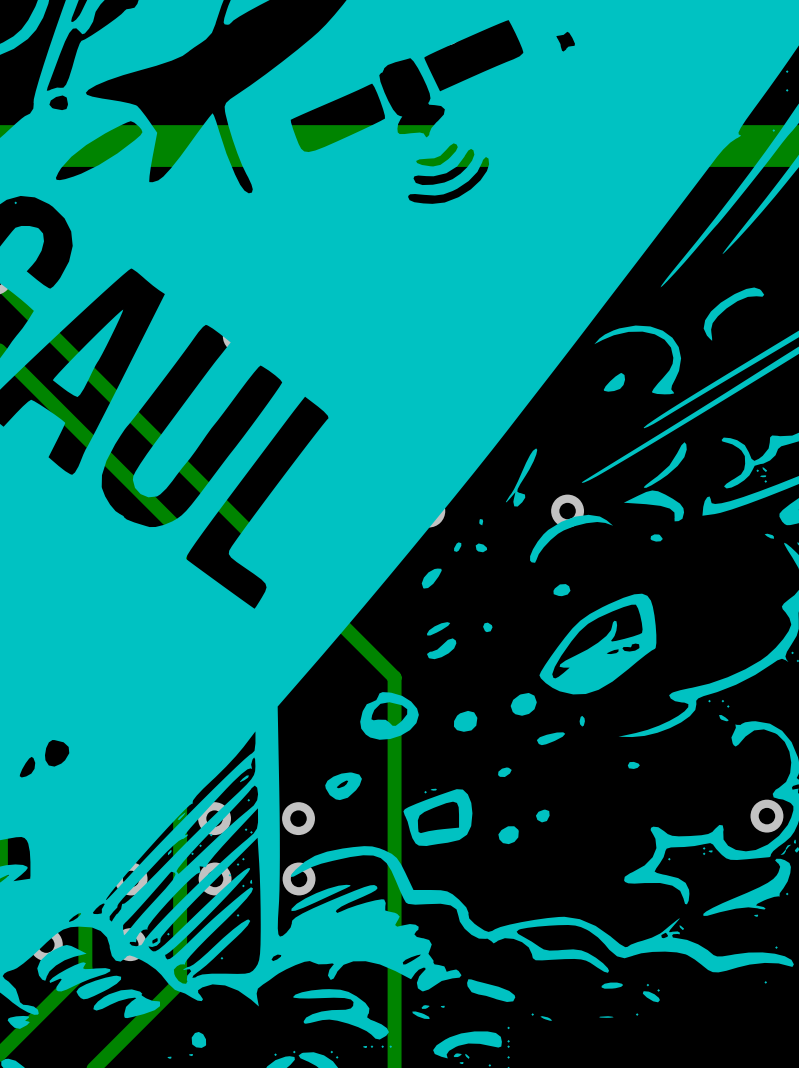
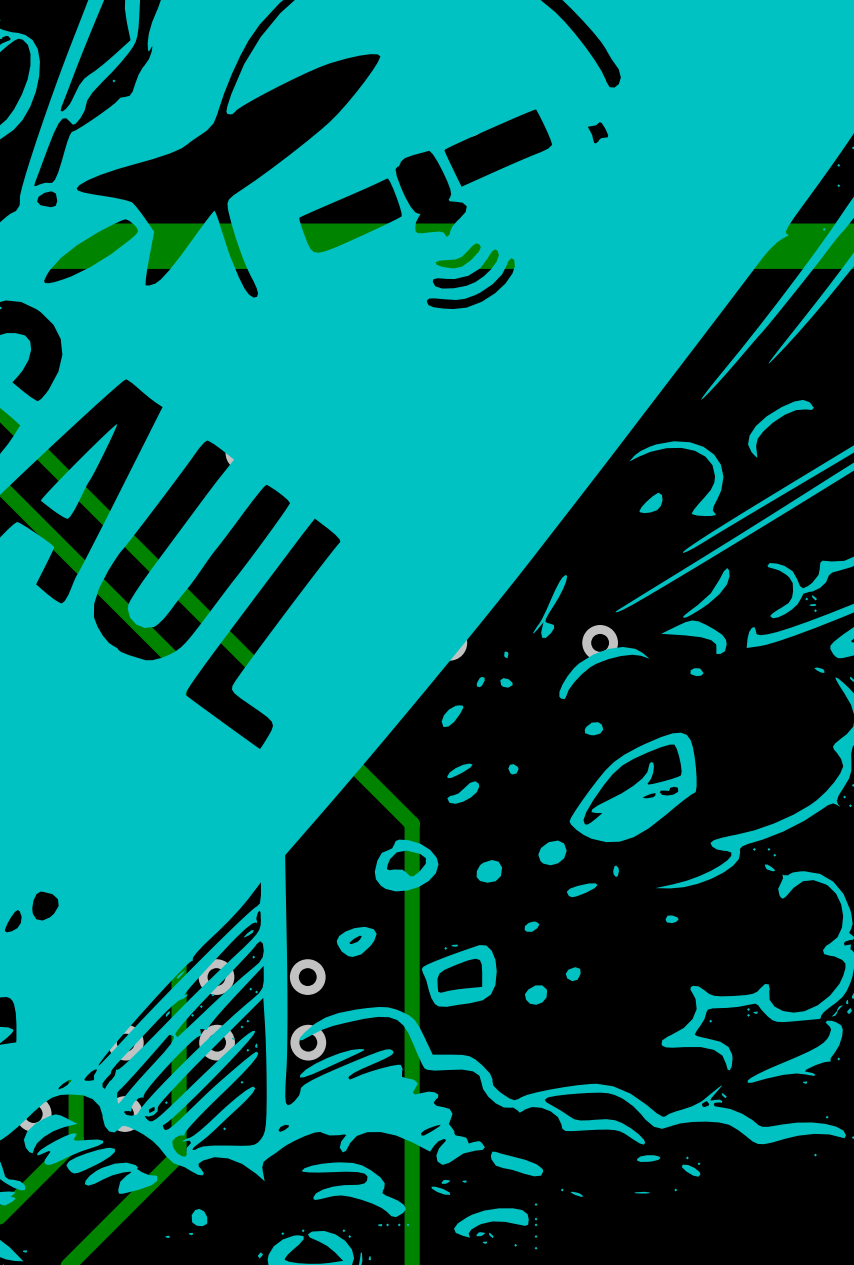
via: (766, 816) -> none

